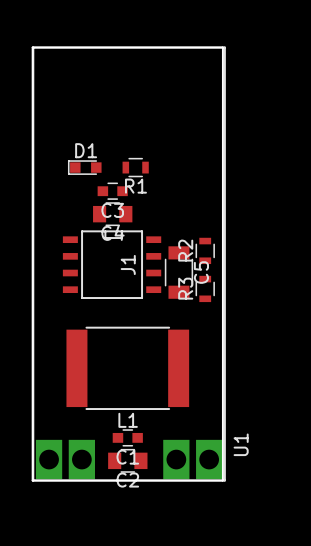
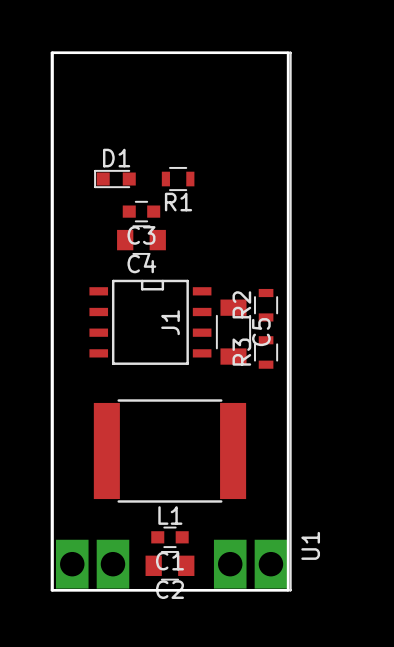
D1 position: (84, 167) -> (114, 179)
R1 position: (135, 167) -> (178, 179)
C3 position: (112, 191) -> (141, 211)
C4 position: (112, 214) -> (141, 240)

